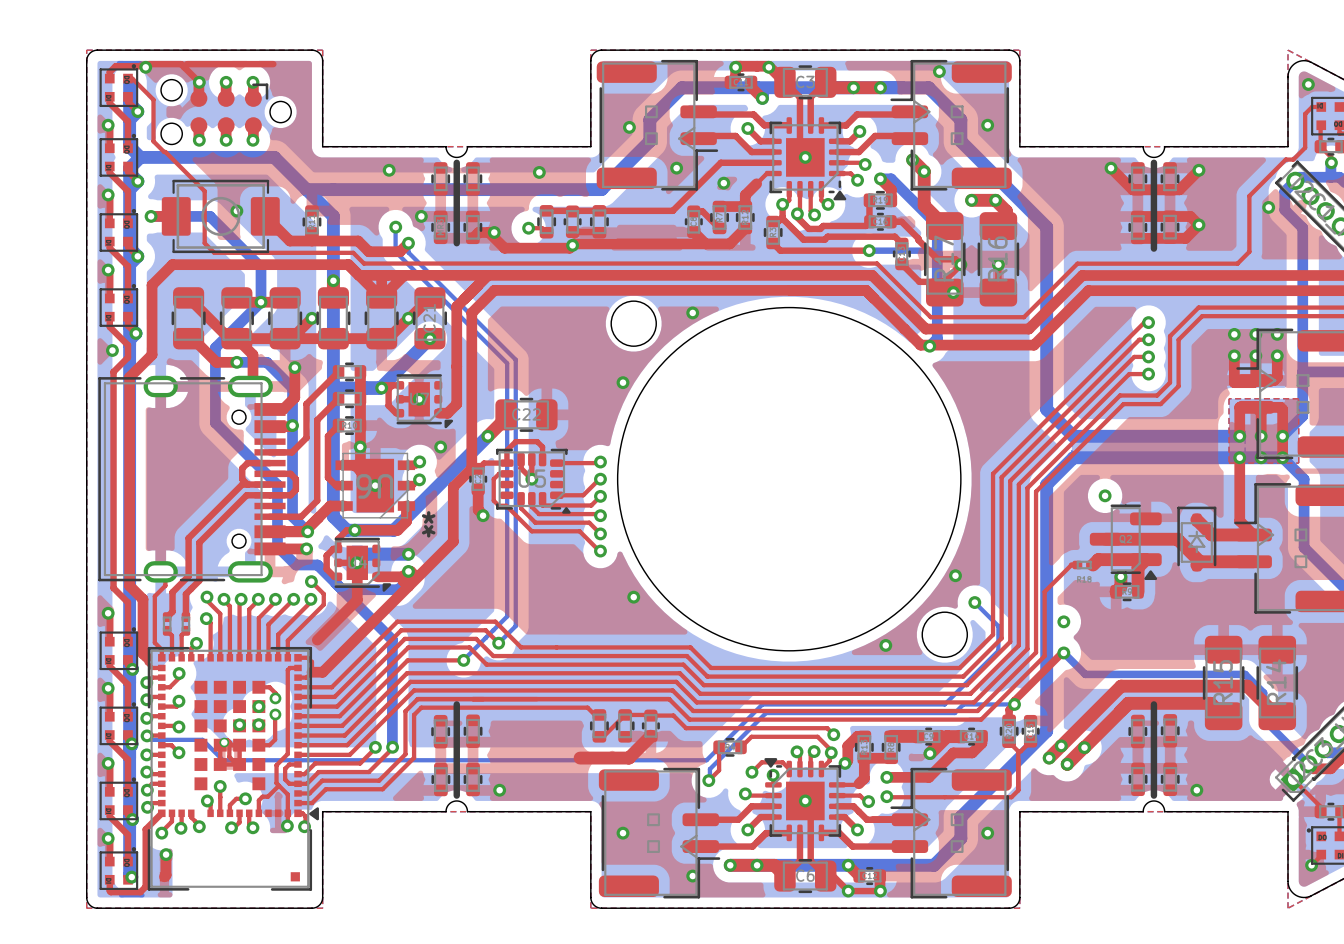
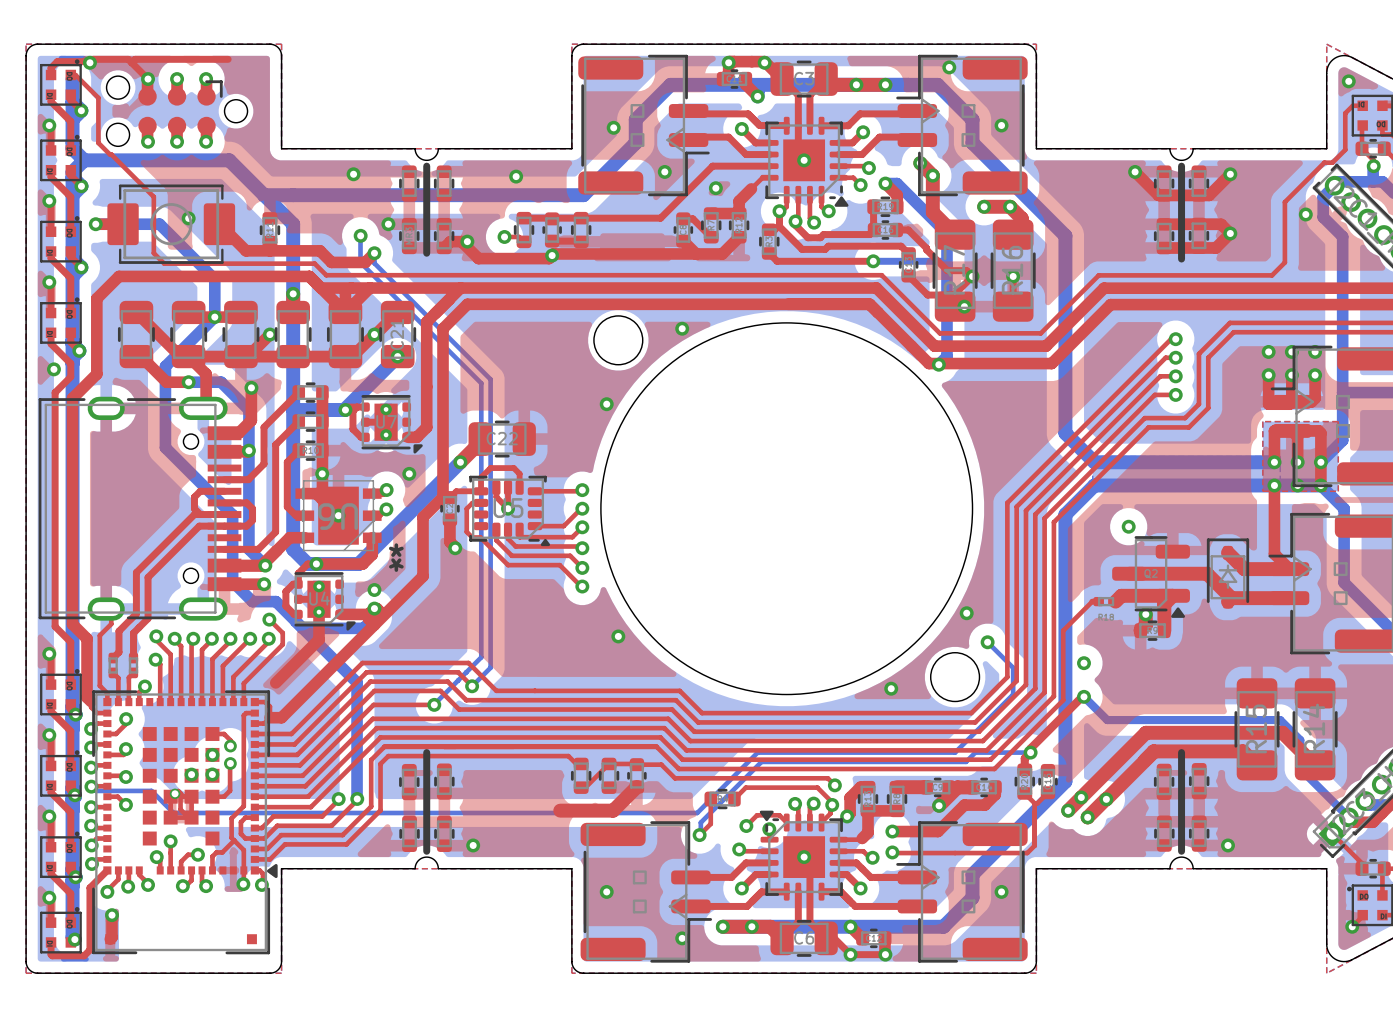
part footprint: [396, 374, 454, 429] -> [361, 395, 423, 454]
via: (419, 399) -> none
part footprint: [334, 537, 392, 592] -> [294, 572, 356, 631]
bottom track: (408, 554) (365, 554) (356, 562) -> none
via: (356, 562) -> none

